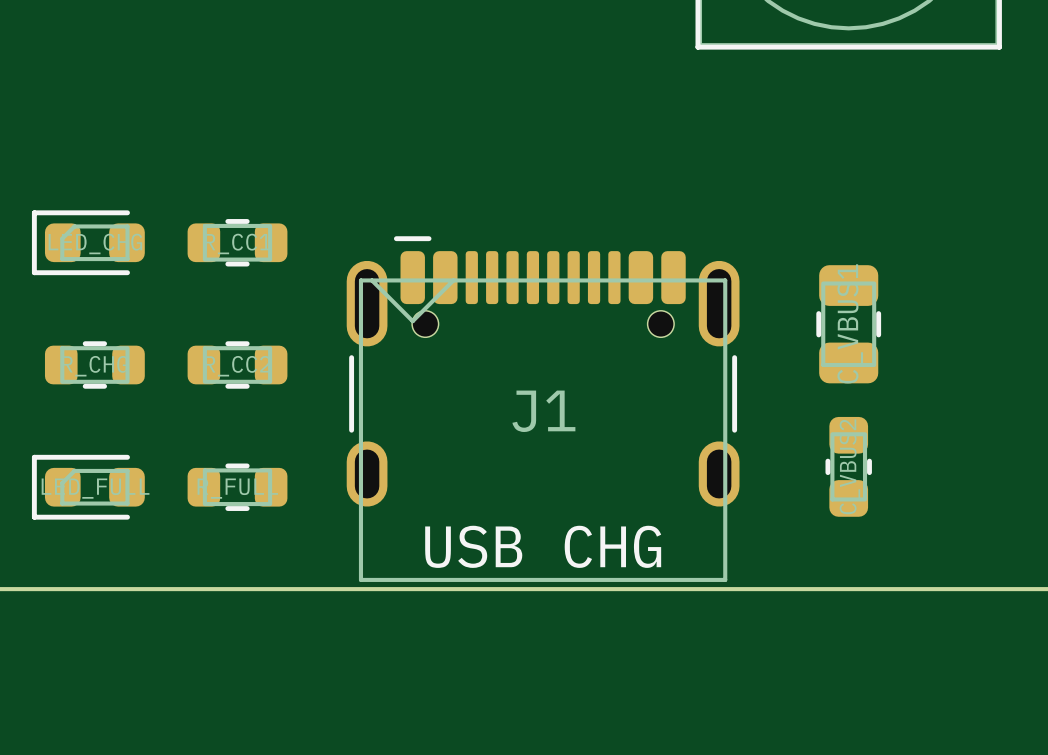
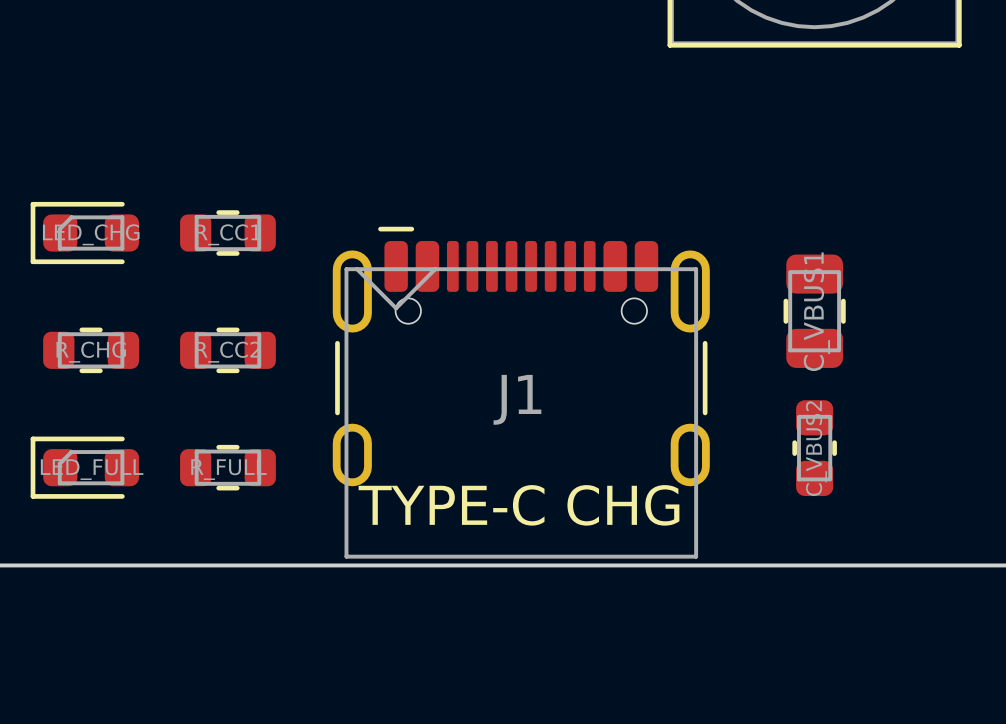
text: USB CHG (543, 546) -> TYPE-C CHG (519, 505)

